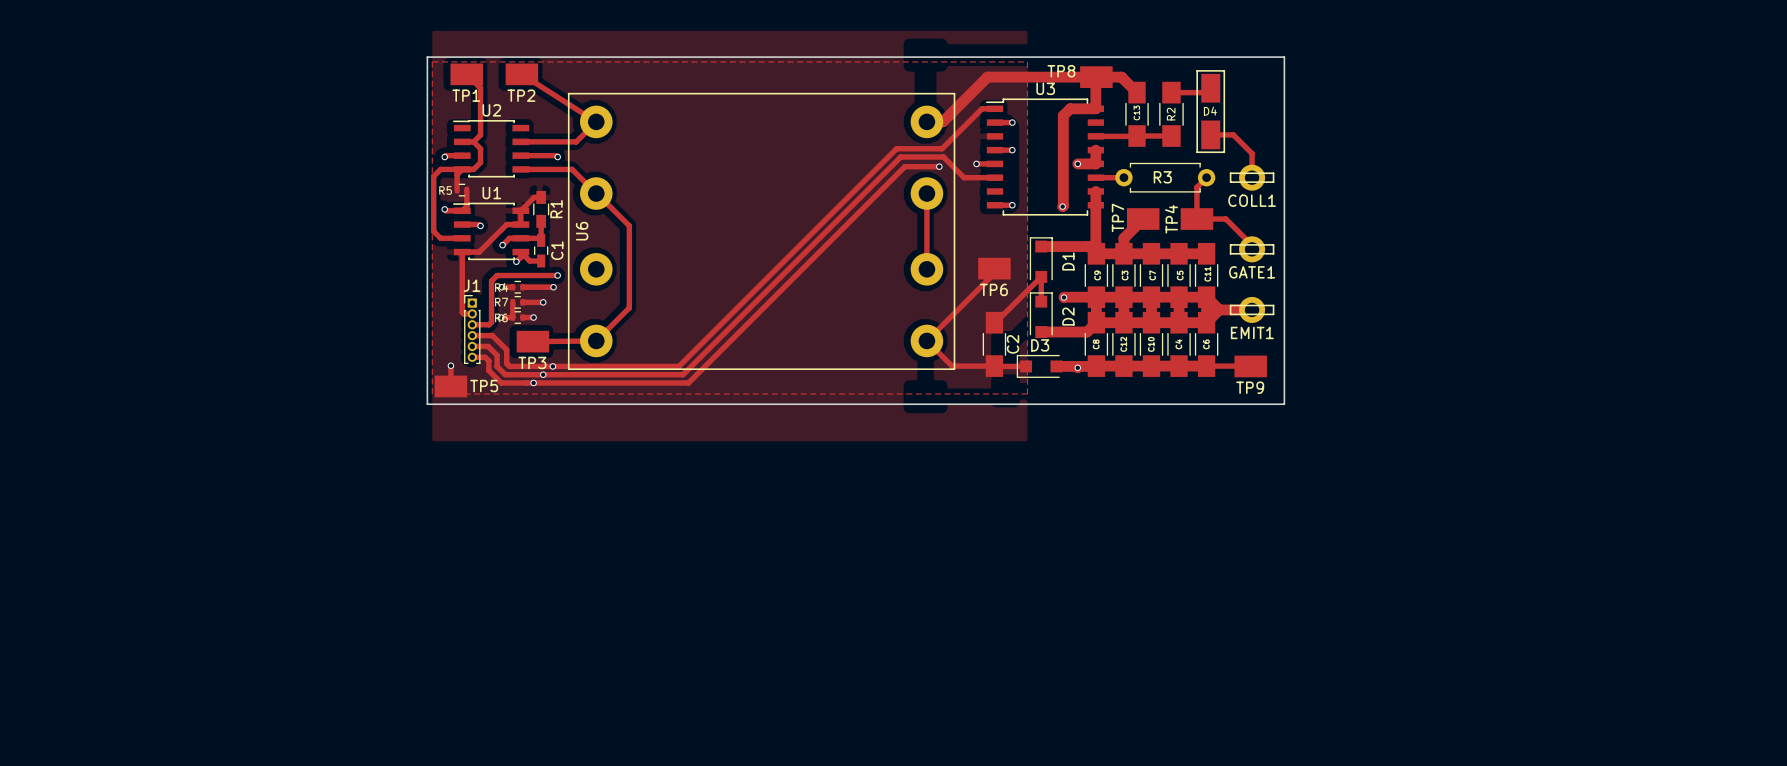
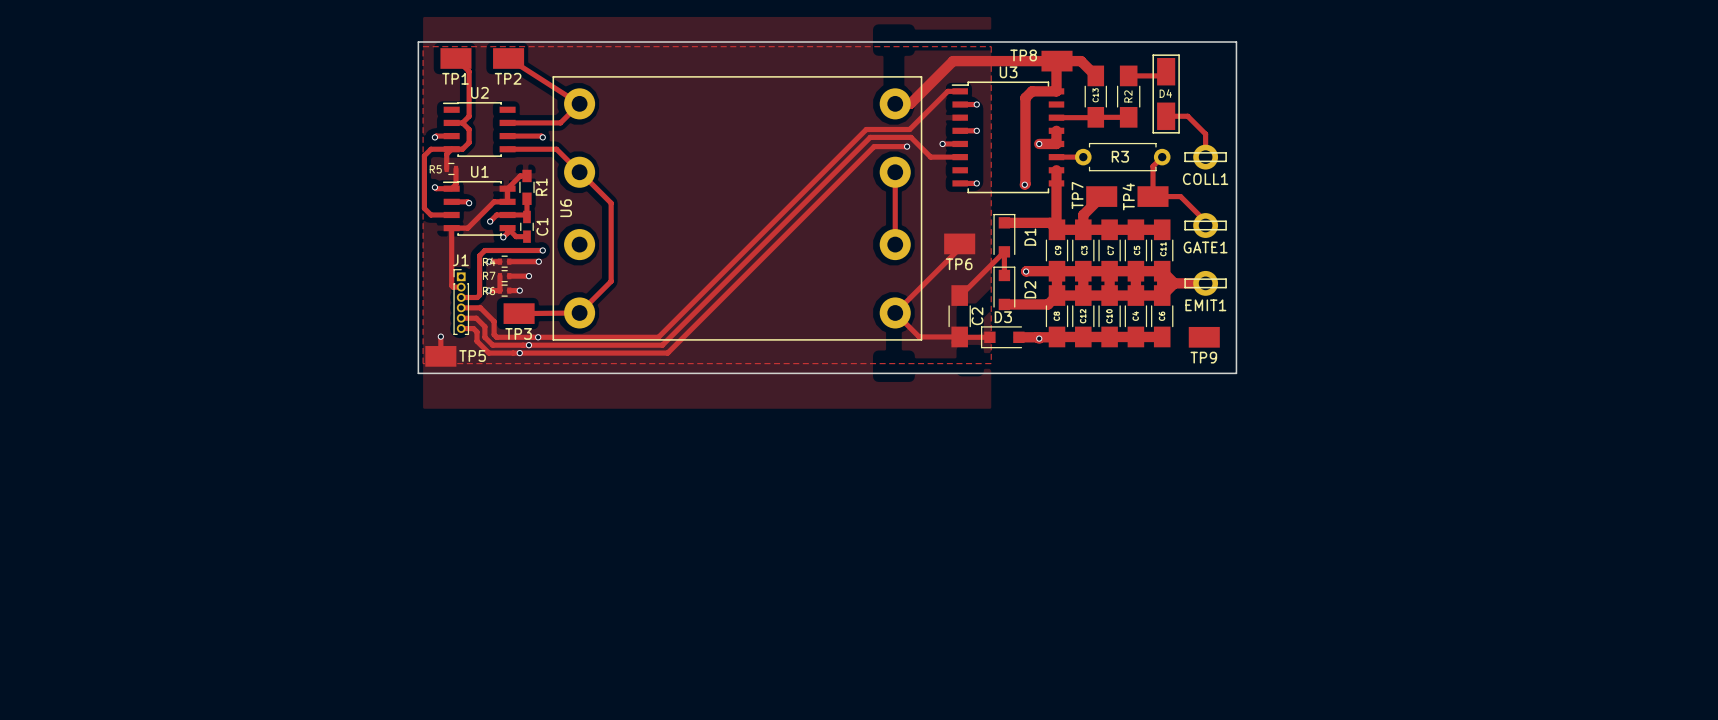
track: (1206, 366) (1250, 366) -> none

